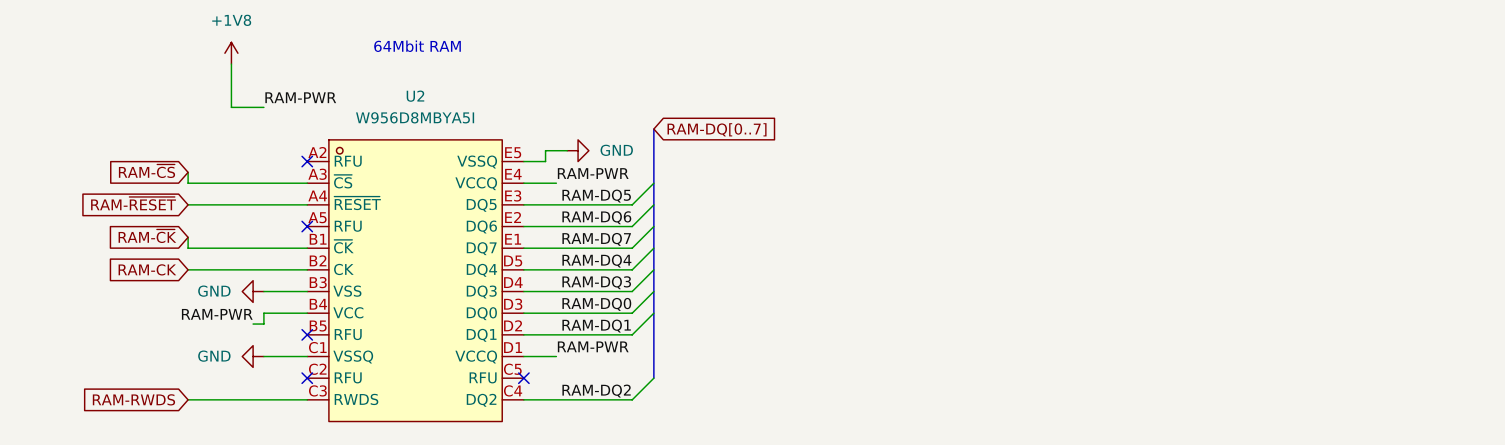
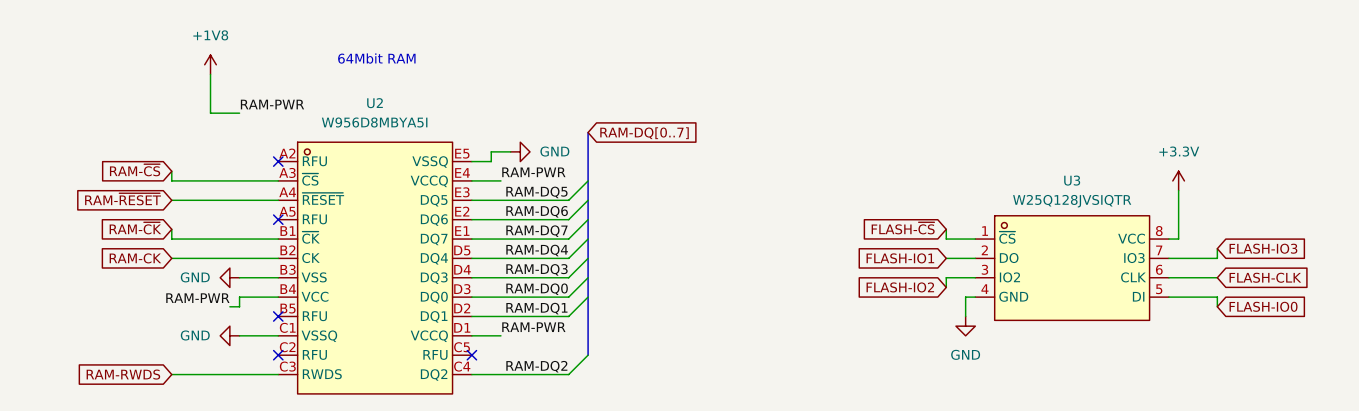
power symbol: none -> +3.3V (1178, 180)
wire: none -> (1178, 190) (1178, 239) (1168, 239)
global label: none -> FLASH-~{CS} (903, 228)
wire: none -> (946, 229) (946, 239) (975, 239)
wire: none -> (1217, 248) (1217, 258) (1168, 258)
global label: none -> FLASH-IO3 (1263, 248)
global label: none -> FLASH-IO1 (900, 258)
wire: none -> (946, 258) (975, 258)
U3: none -> W25Q128JVSIQTR (1072, 268)
wire: none -> (975, 277) (946, 277) (946, 287)
wire: none -> (1168, 277) (1217, 277)
global label: none -> FLASH-CLK (1265, 277)
global label: none -> FLASH-IO2 (900, 287)
wire: none -> (975, 297) (965, 297) (965, 316)
wire: none -> (1168, 297) (1217, 297) (1217, 306)
global label: none -> FLASH-IO0 (1263, 306)
power symbol: none -> GND (965, 326)

